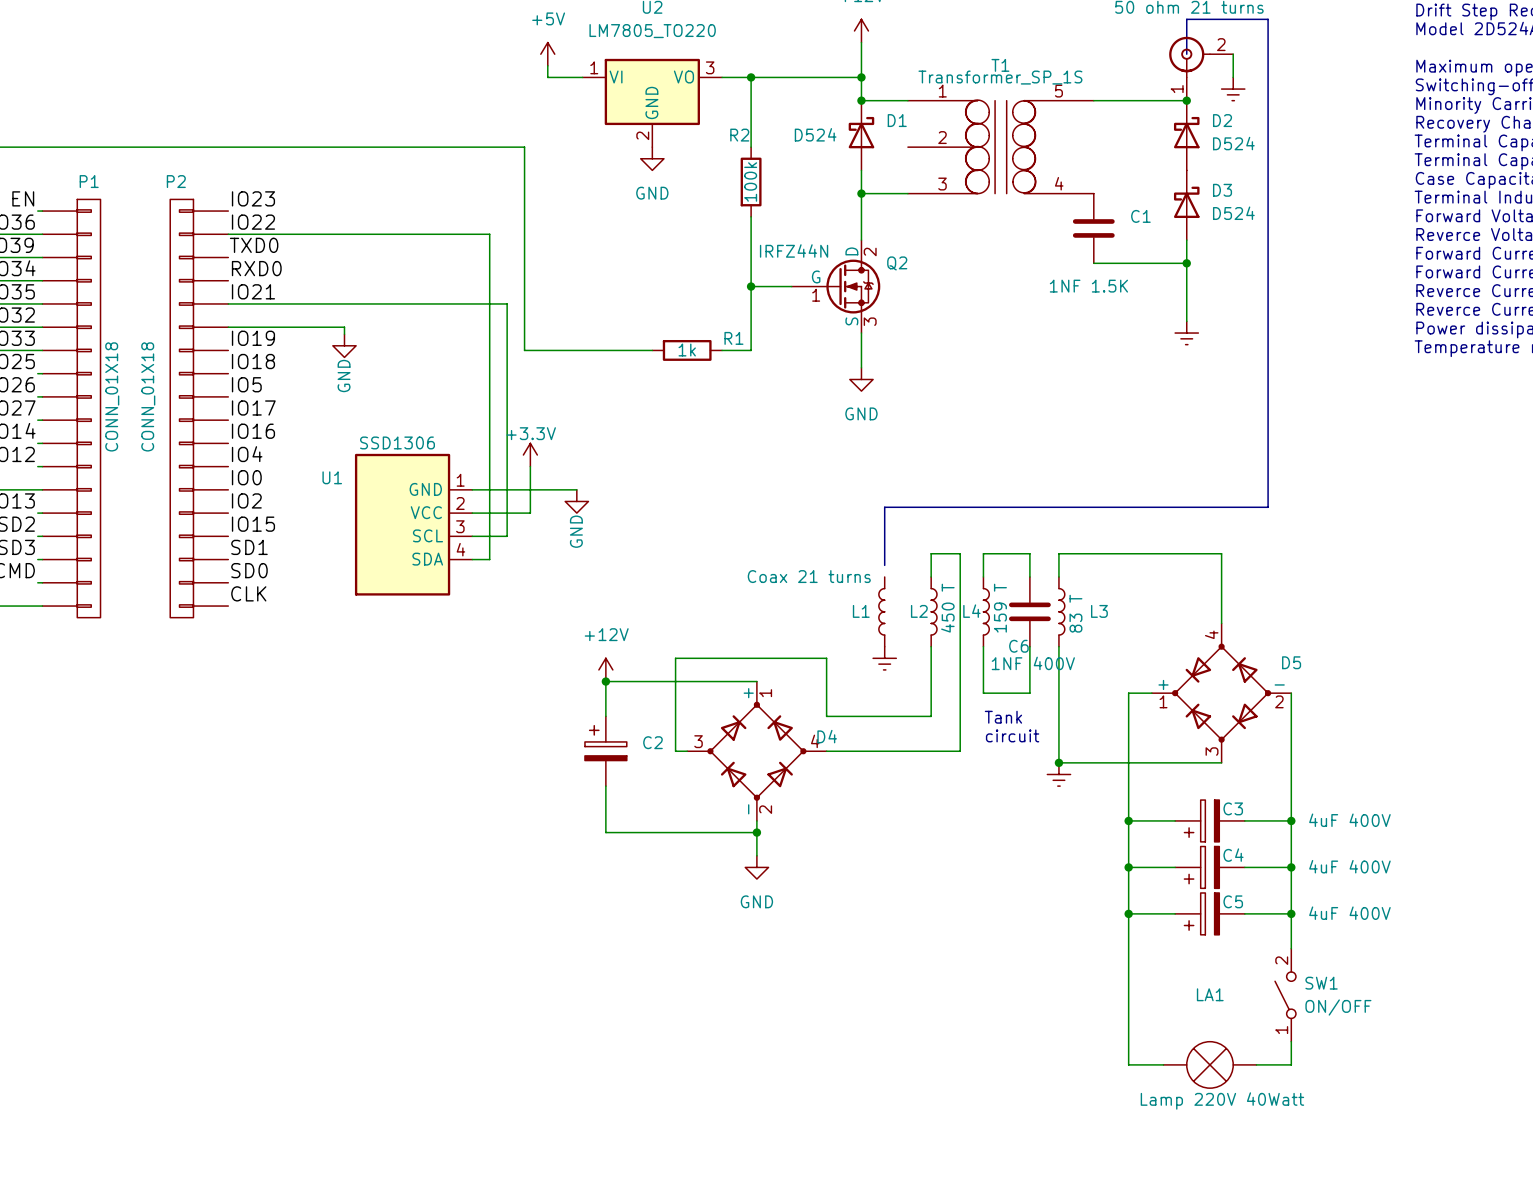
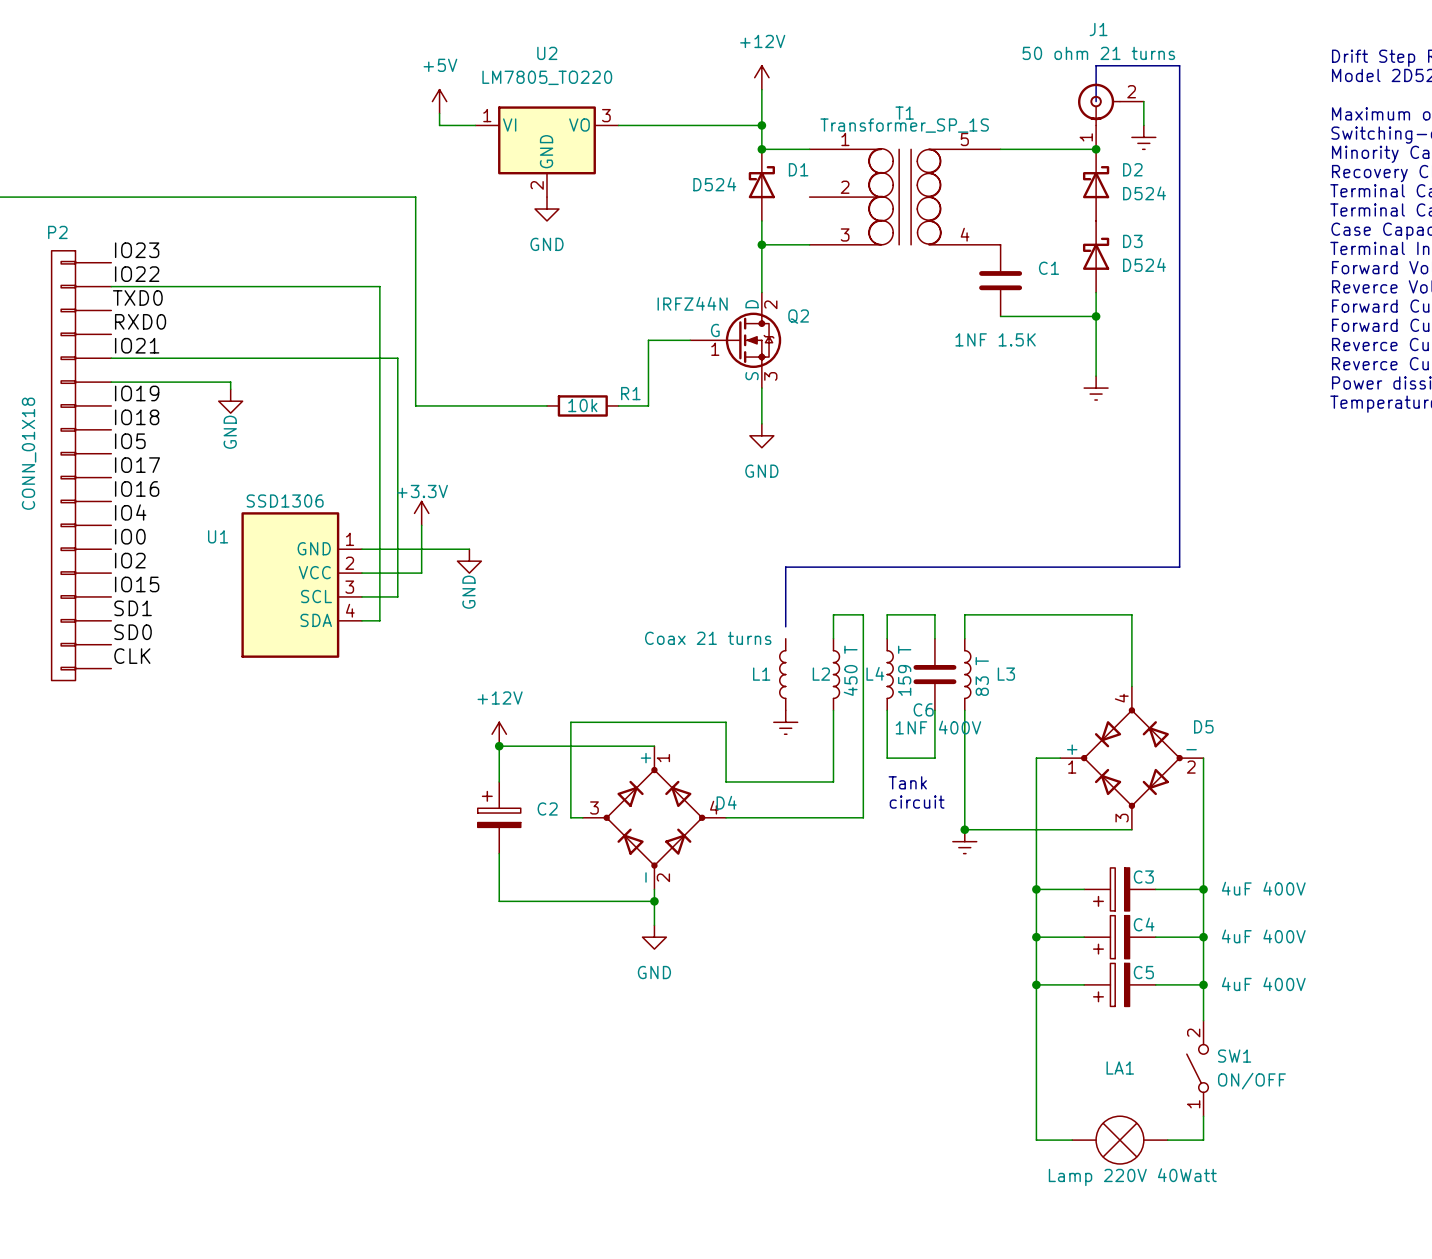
wire: (751, 77) (751, 147) -> none
junction: (751, 77) -> none
R2: 100k (751, 181) -> none
wire: (751, 216) (751, 286) -> none
junction: (751, 286) -> none
R1 value: 1k (687, 350) -> 10k (582, 405)

